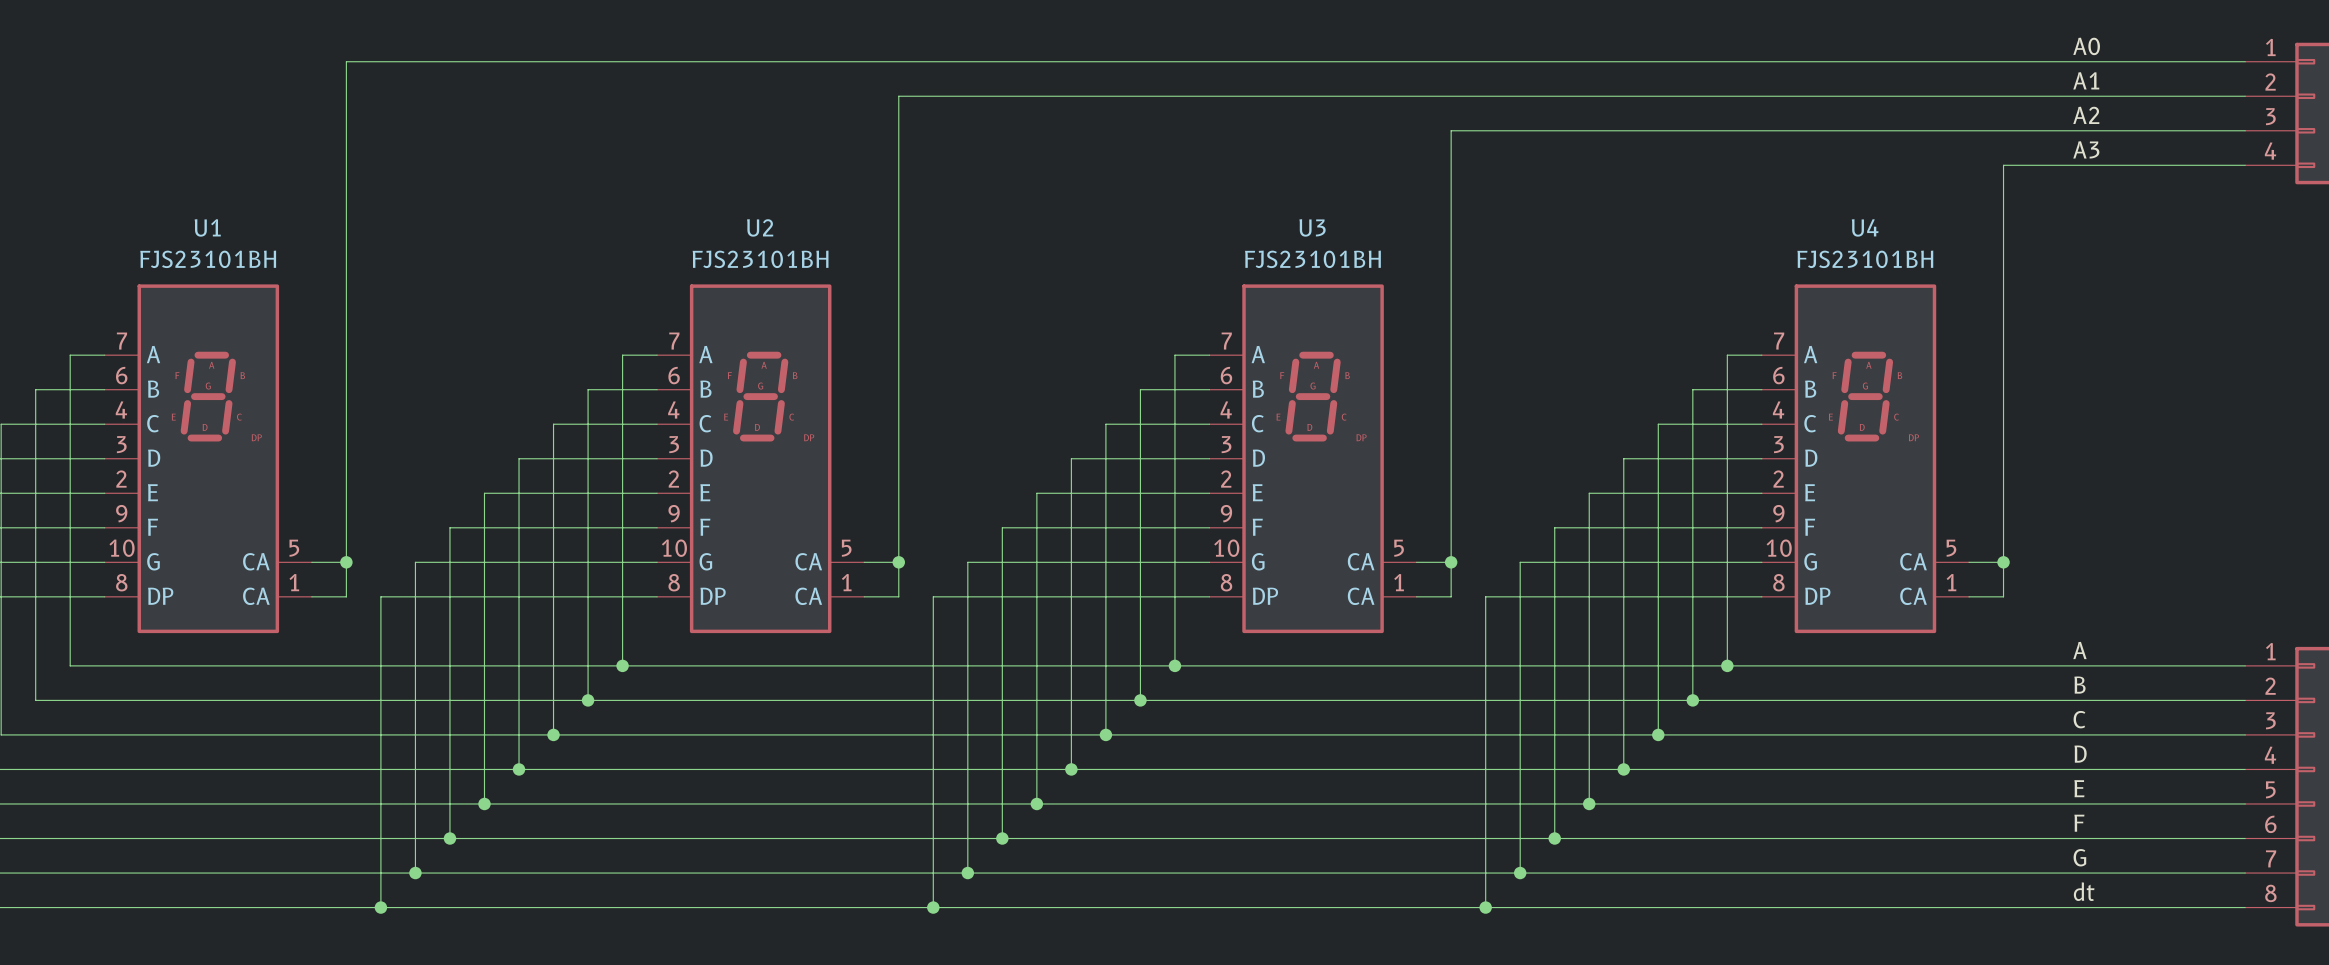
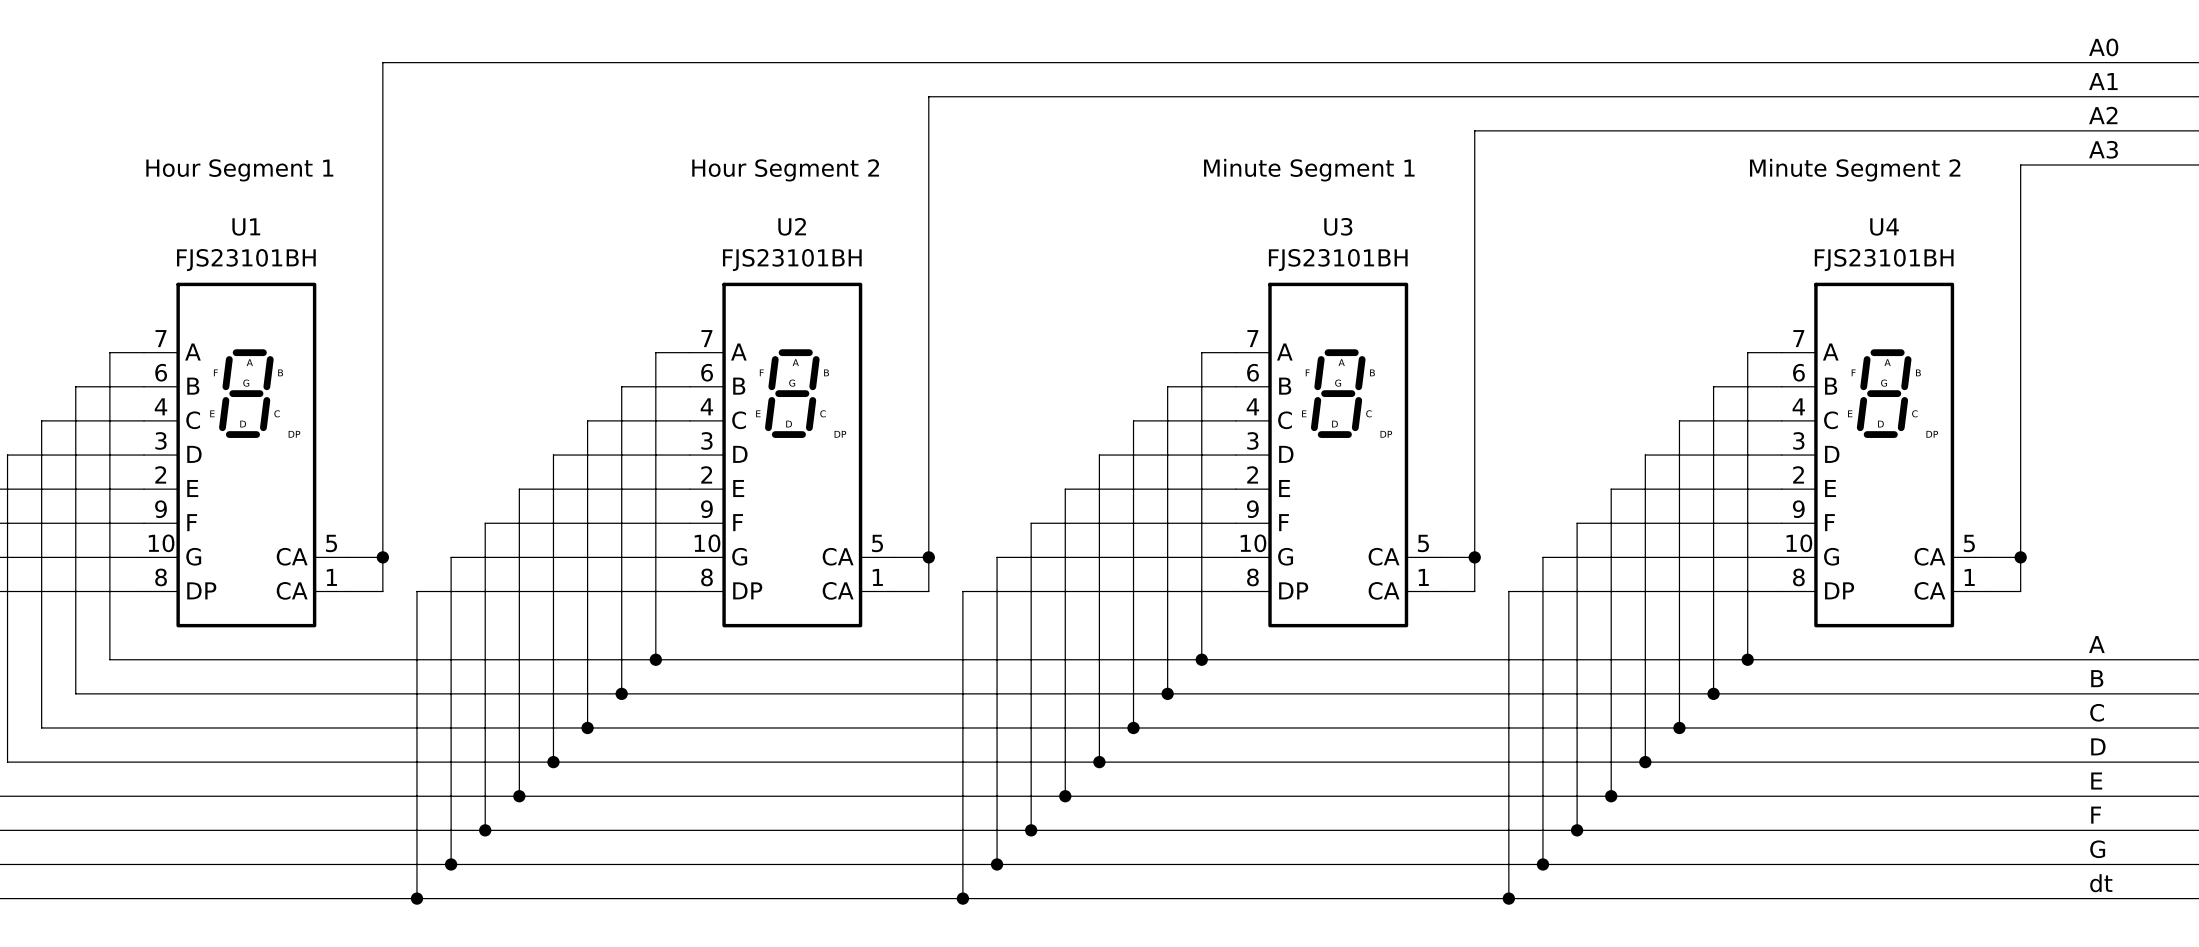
text: none -> Hour Segment 1 (239, 170)
text: none -> Hour Segment 2 (785, 170)
text: none -> Minute Segment 1 (1309, 170)
text: none -> Minute Segment 2 (1855, 170)

